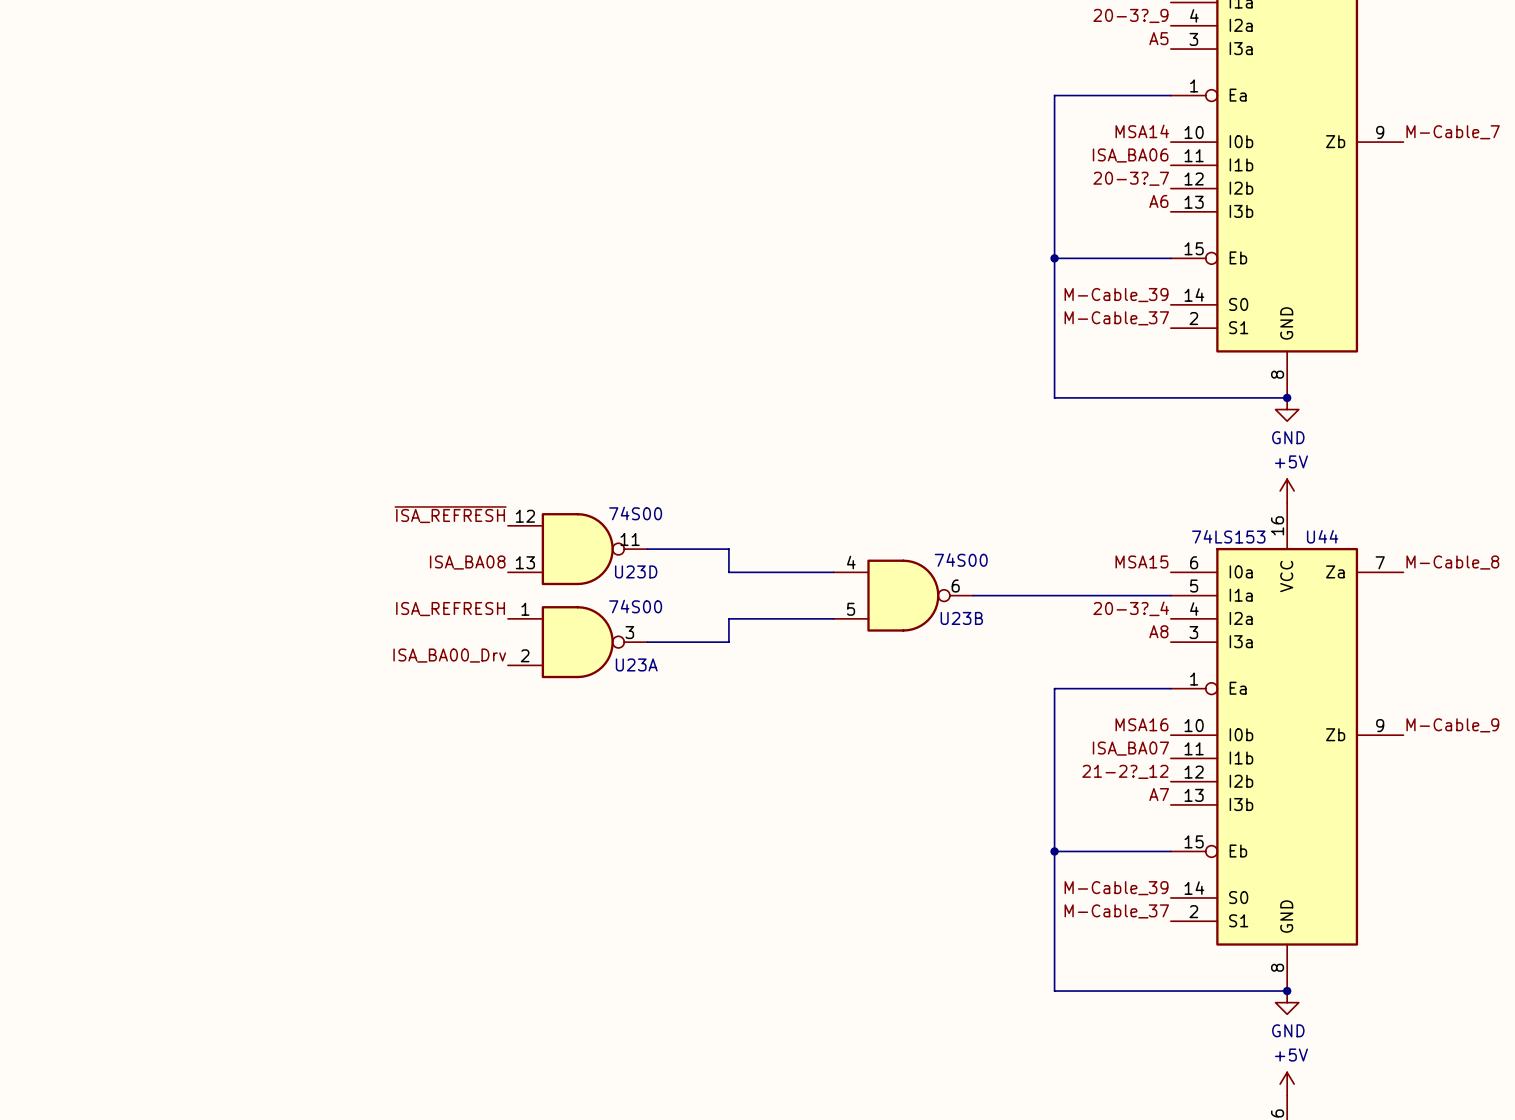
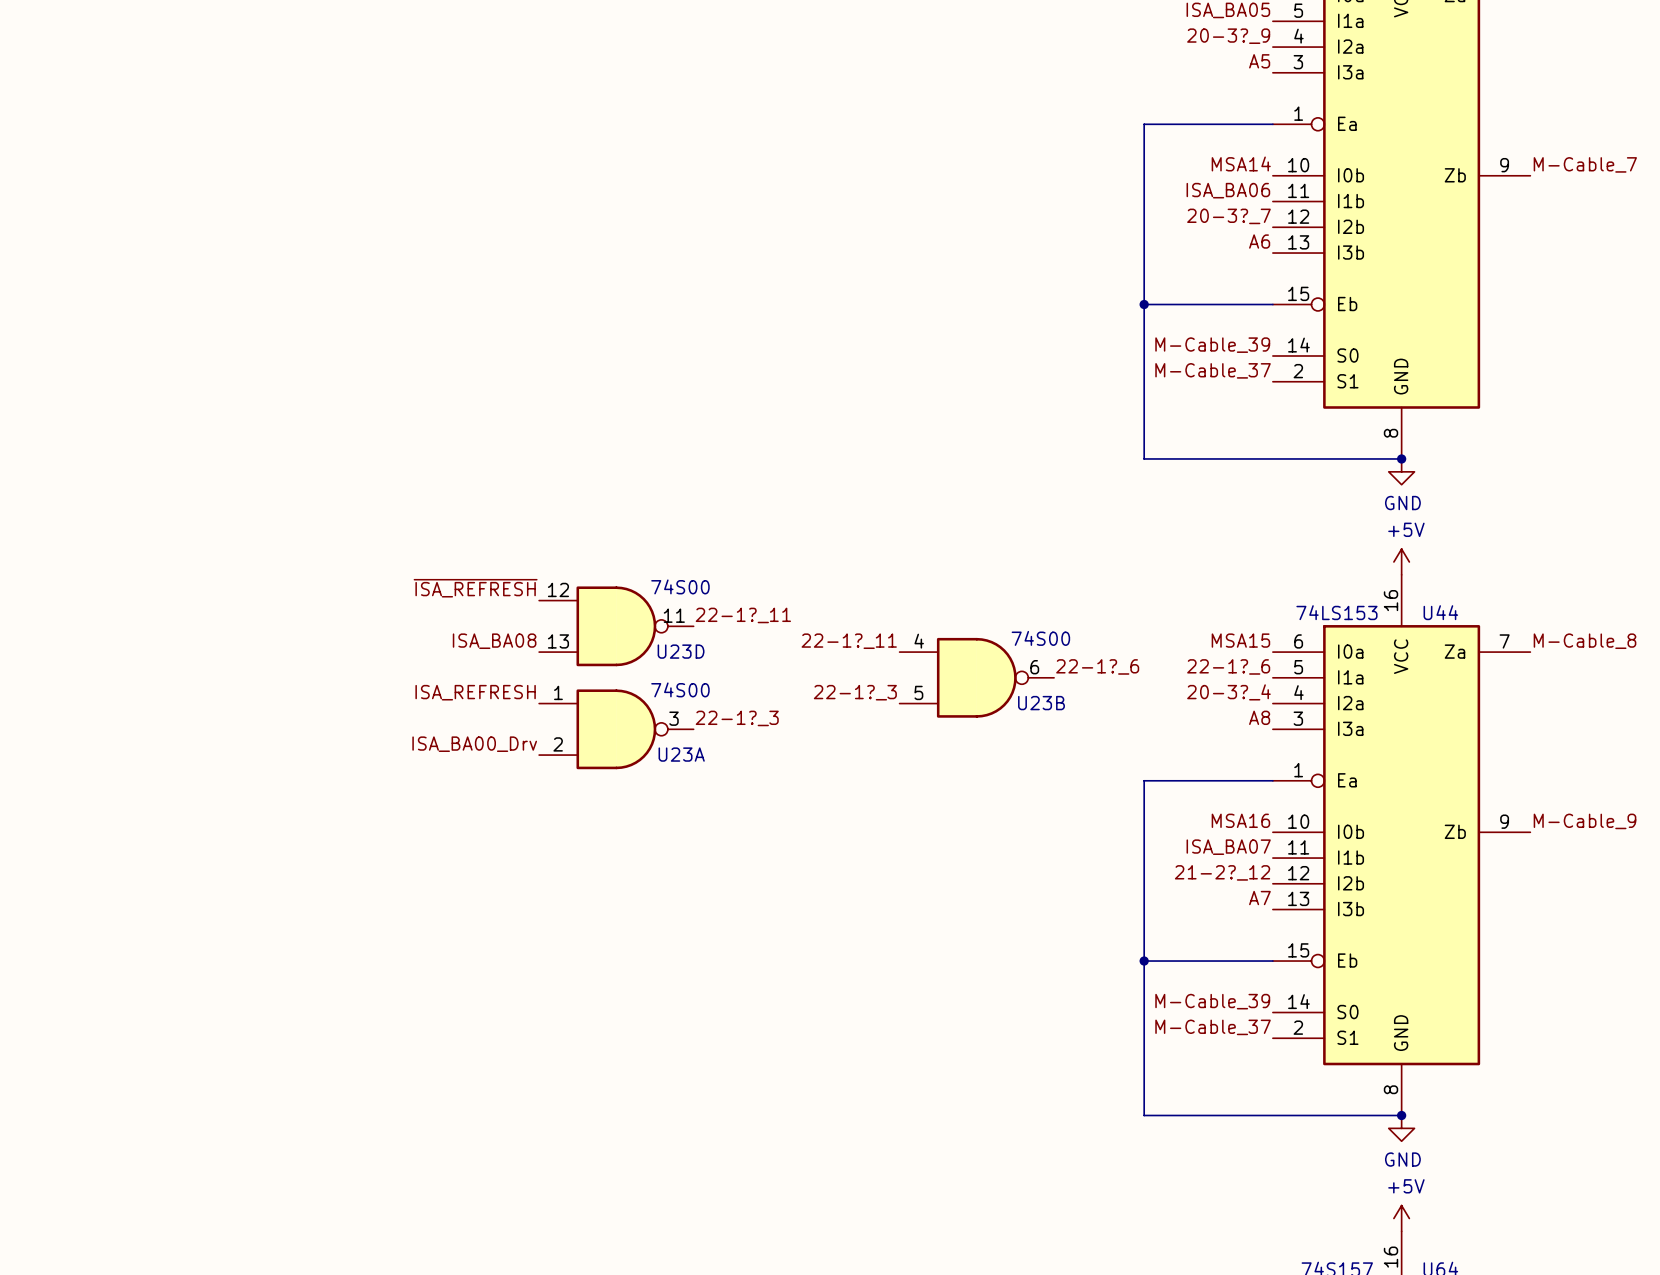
label: none -> 22-1?_11 (743, 615)
wire: (647, 549) (728, 549) (728, 572) (833, 572) -> none
label: none -> 22-1?_11 (849, 641)
label: none -> 22-1?_6 (1097, 666)
label: none -> 22-1?_6 (1228, 666)
wire: (973, 595) (1170, 595) -> none
label: none -> 22-1?_3 (855, 692)
wire: (833, 618) (728, 618) (728, 642) (647, 642) -> none
label: none -> 22-1?_3 (737, 718)

